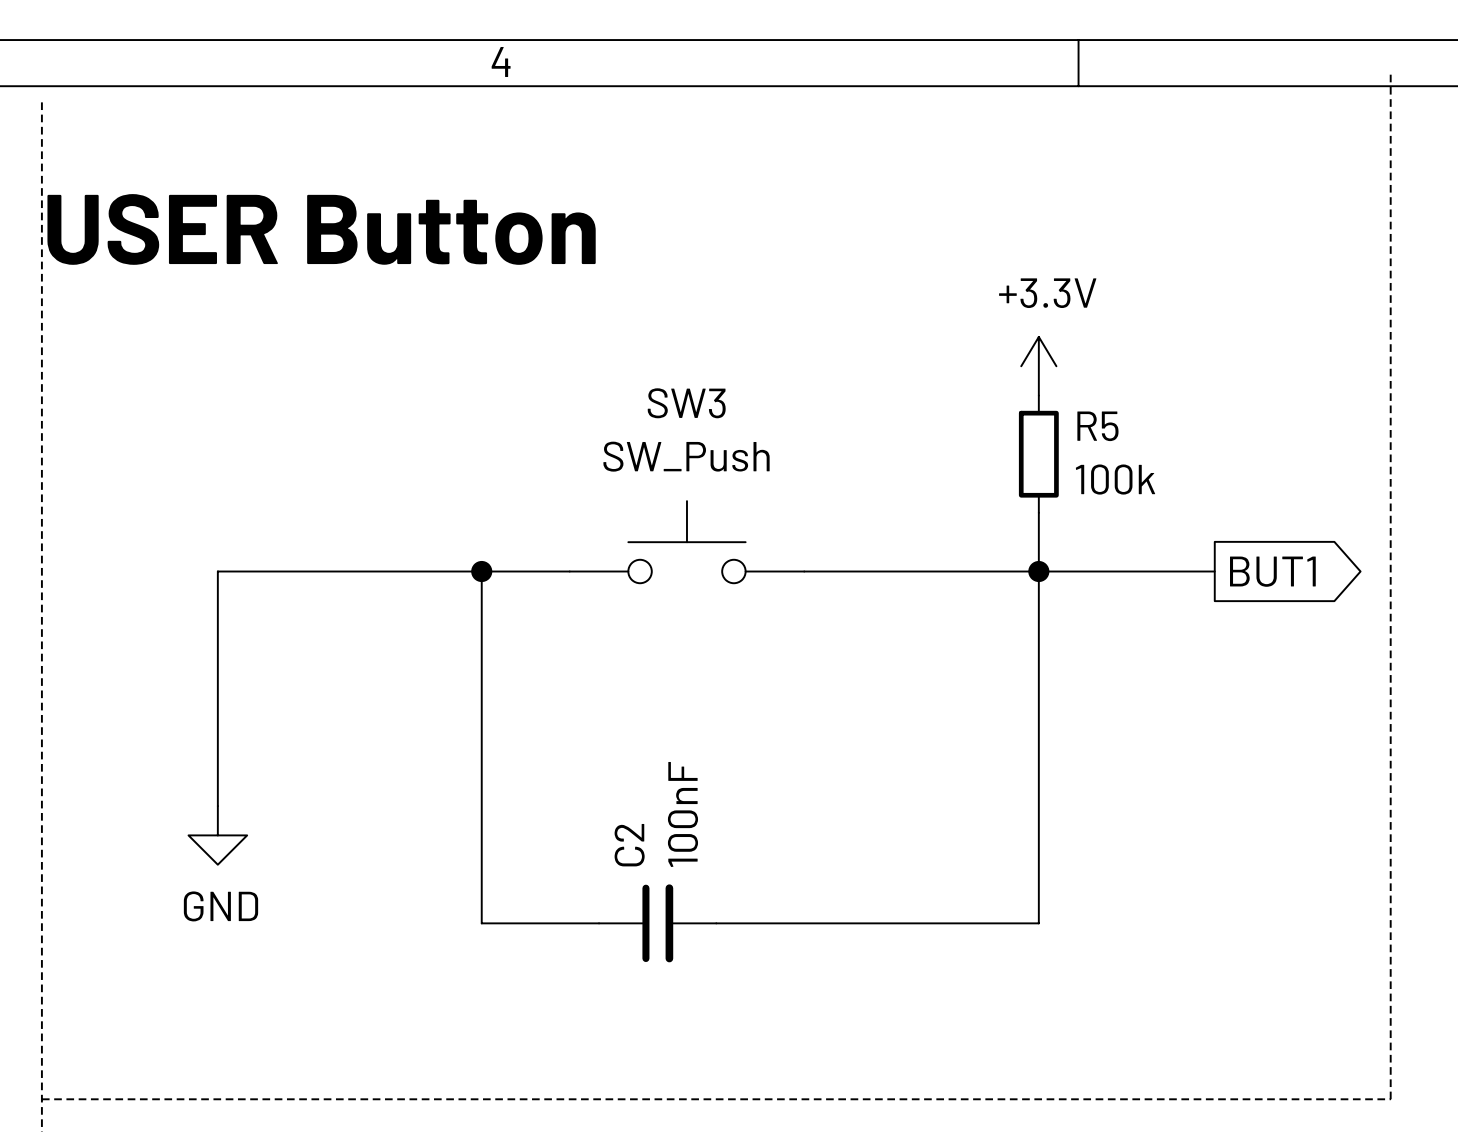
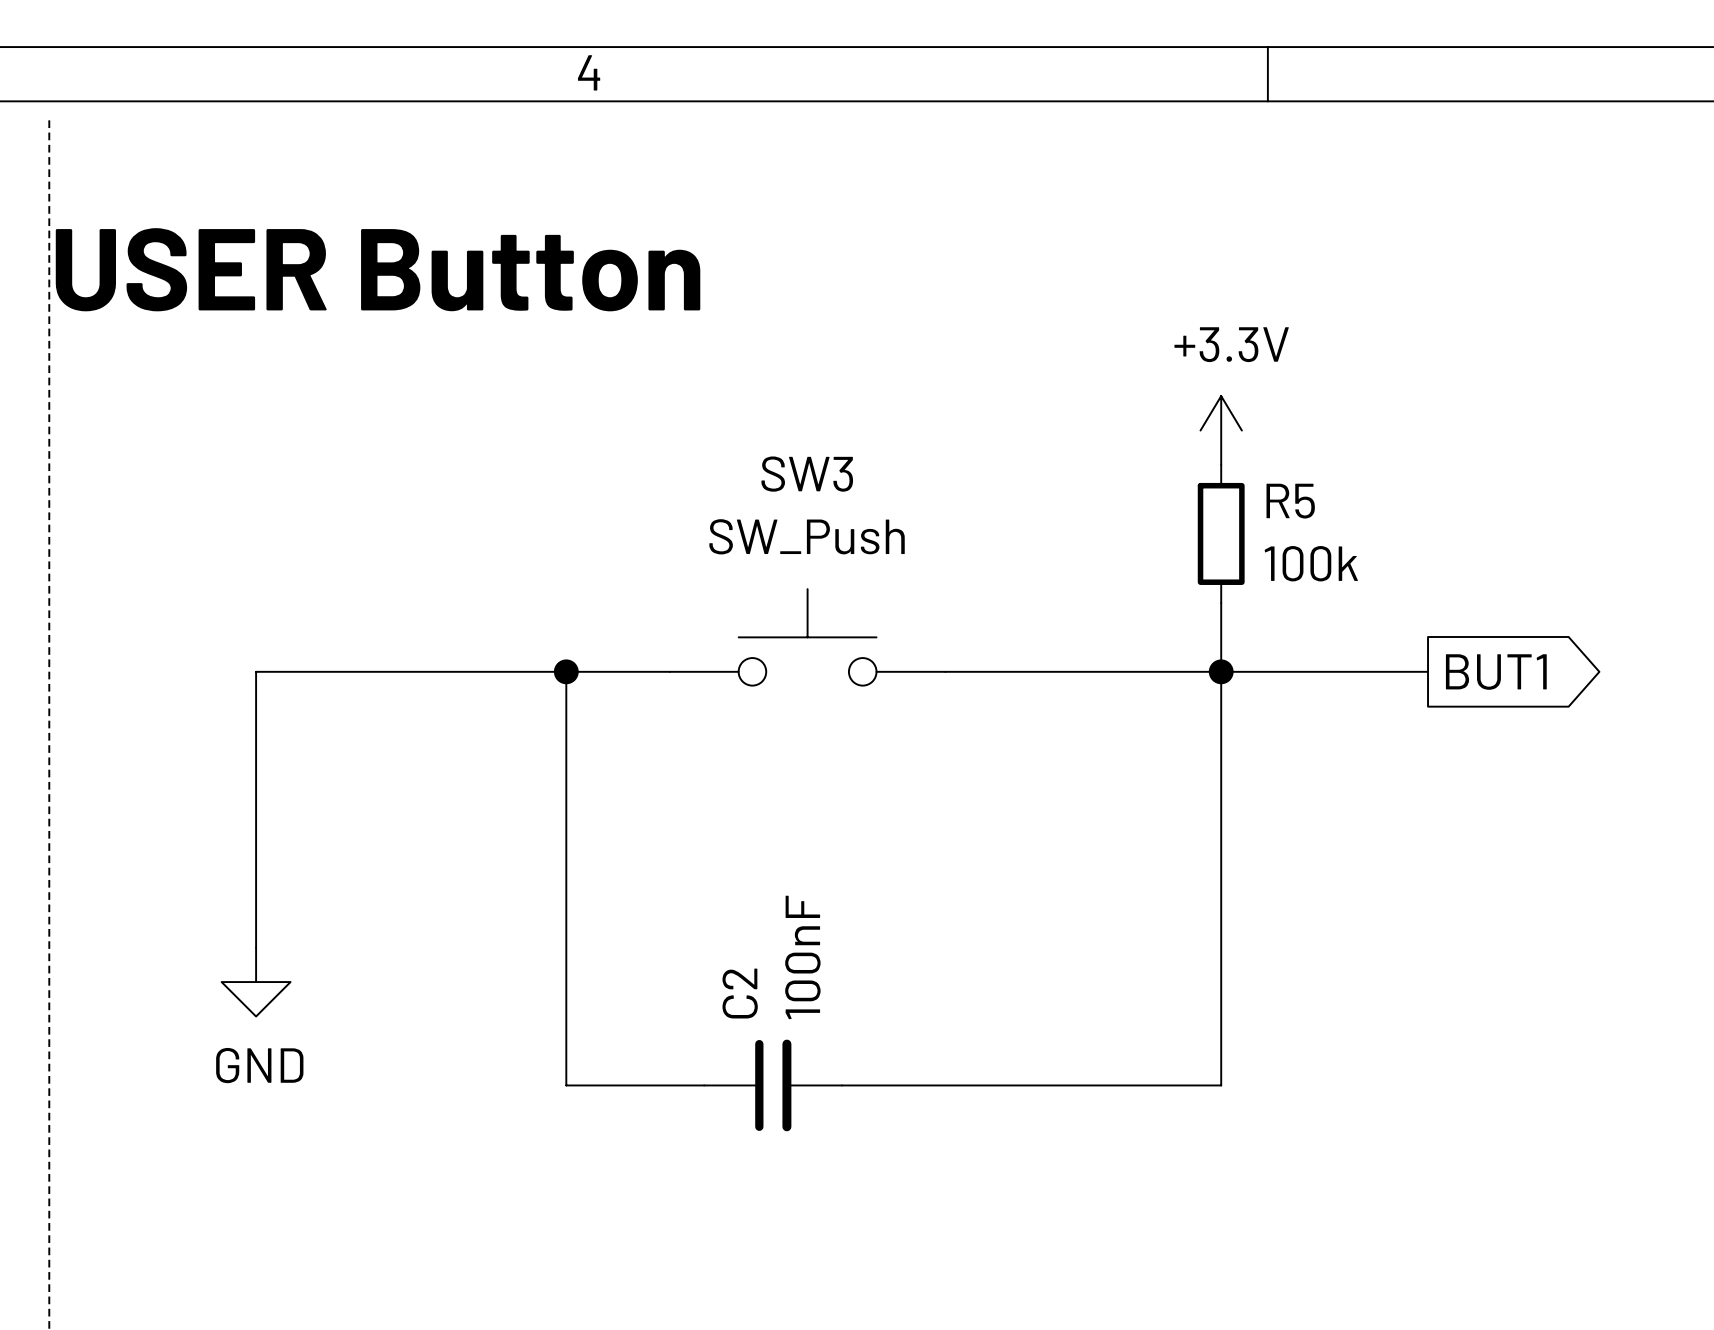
line: (1390, 73) (1390, 1099) (41, 1099) -> none

